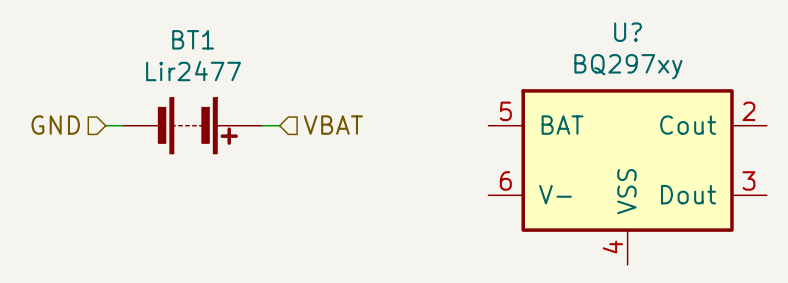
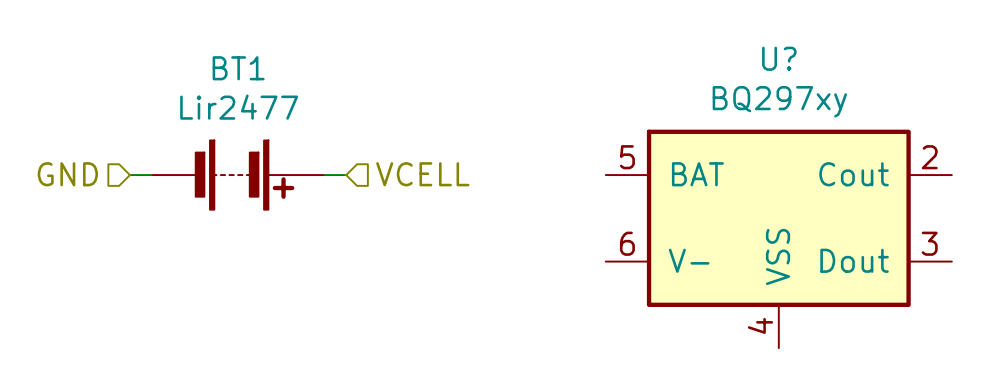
hierarchical label: VBAT (333, 125) -> VCELL (422, 174)

